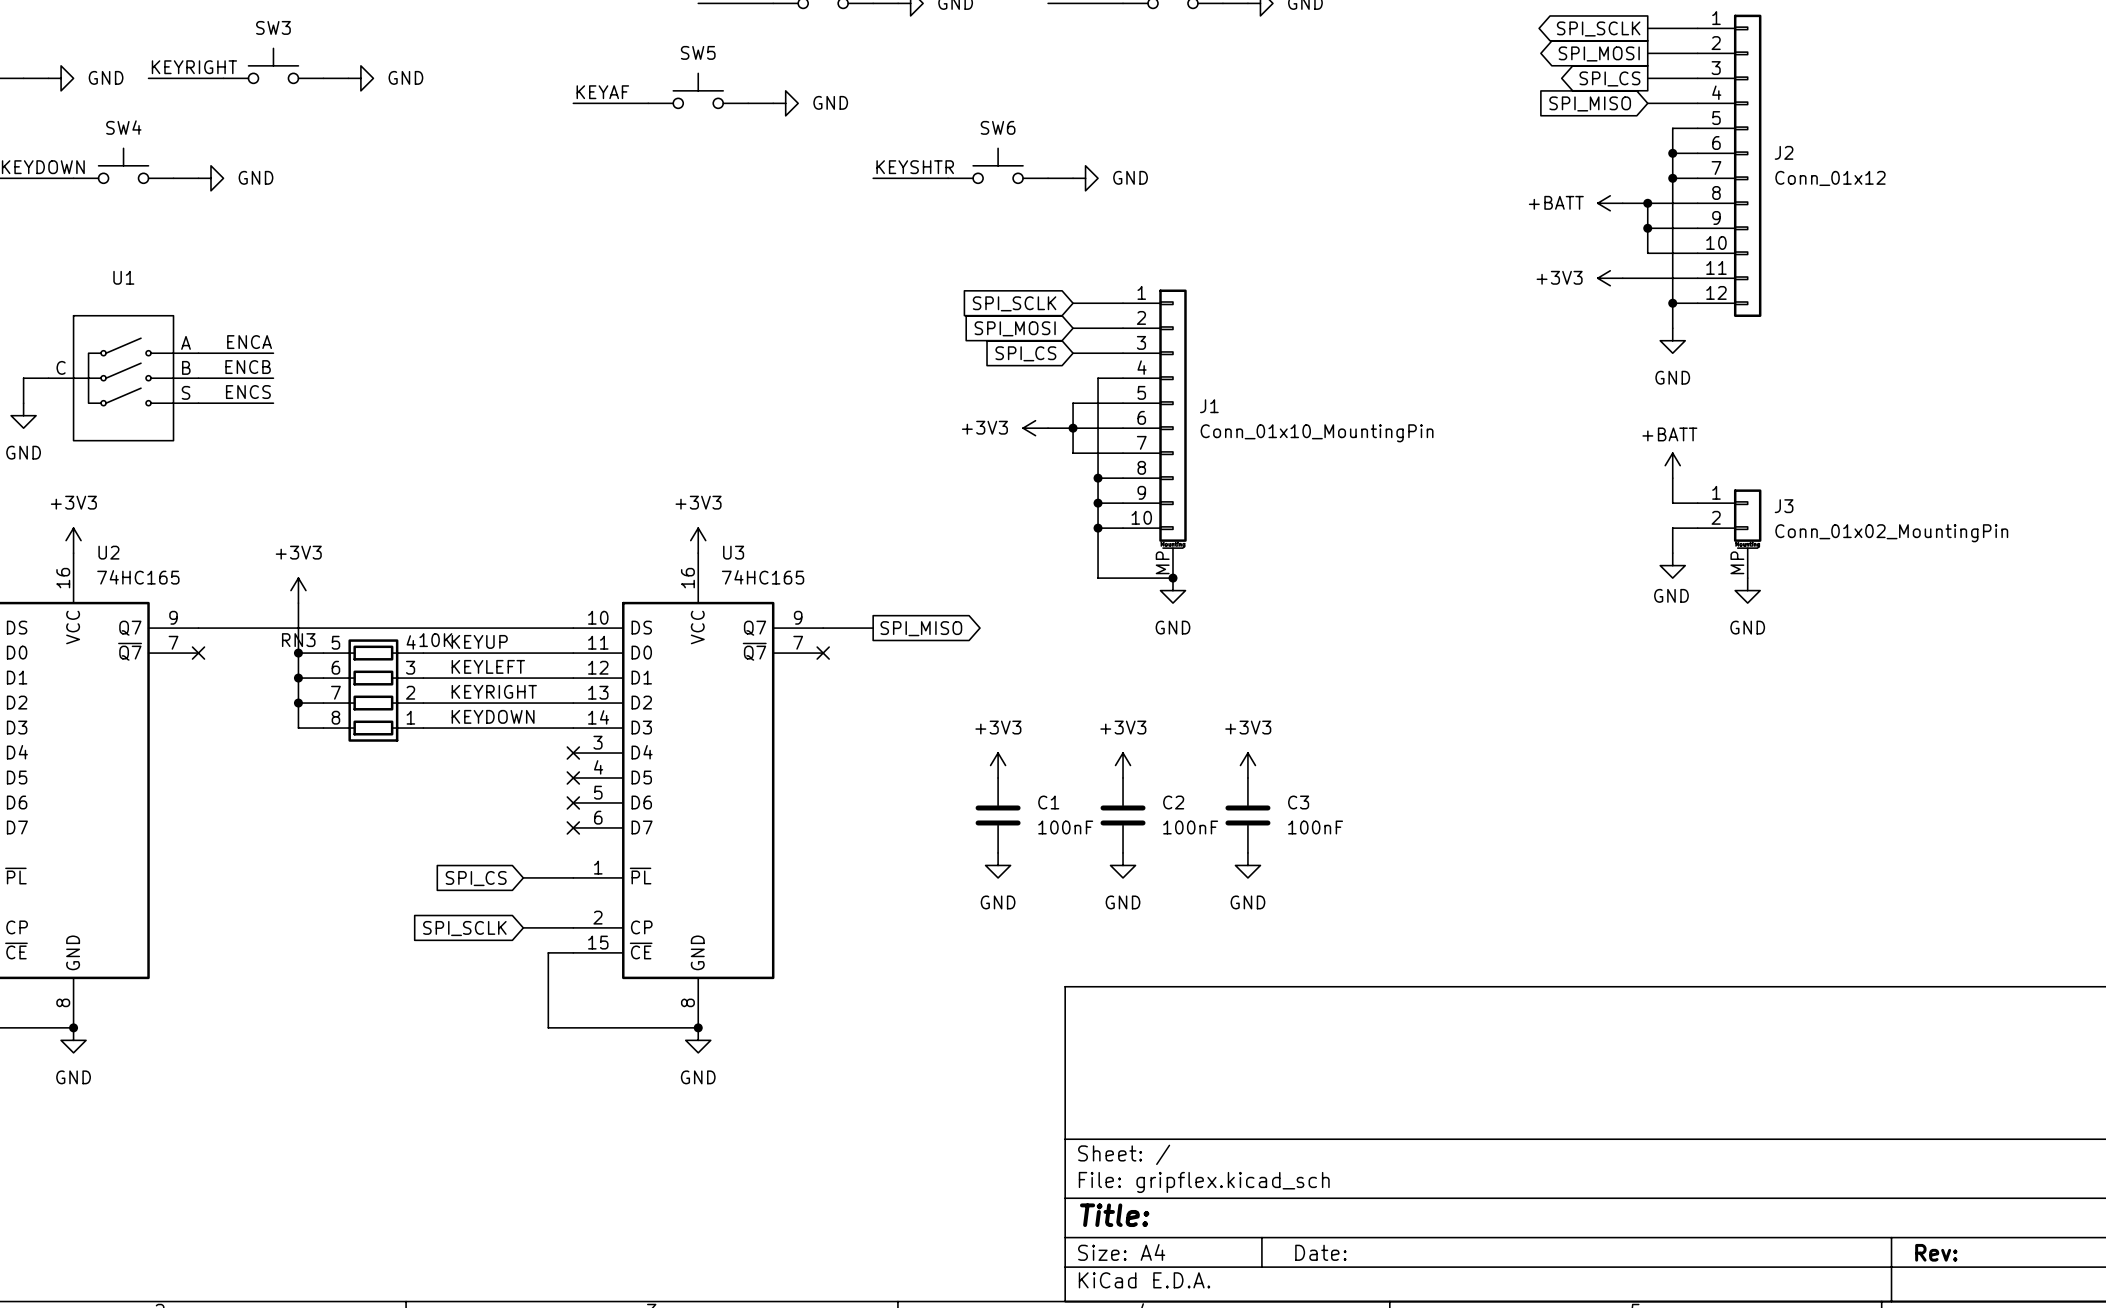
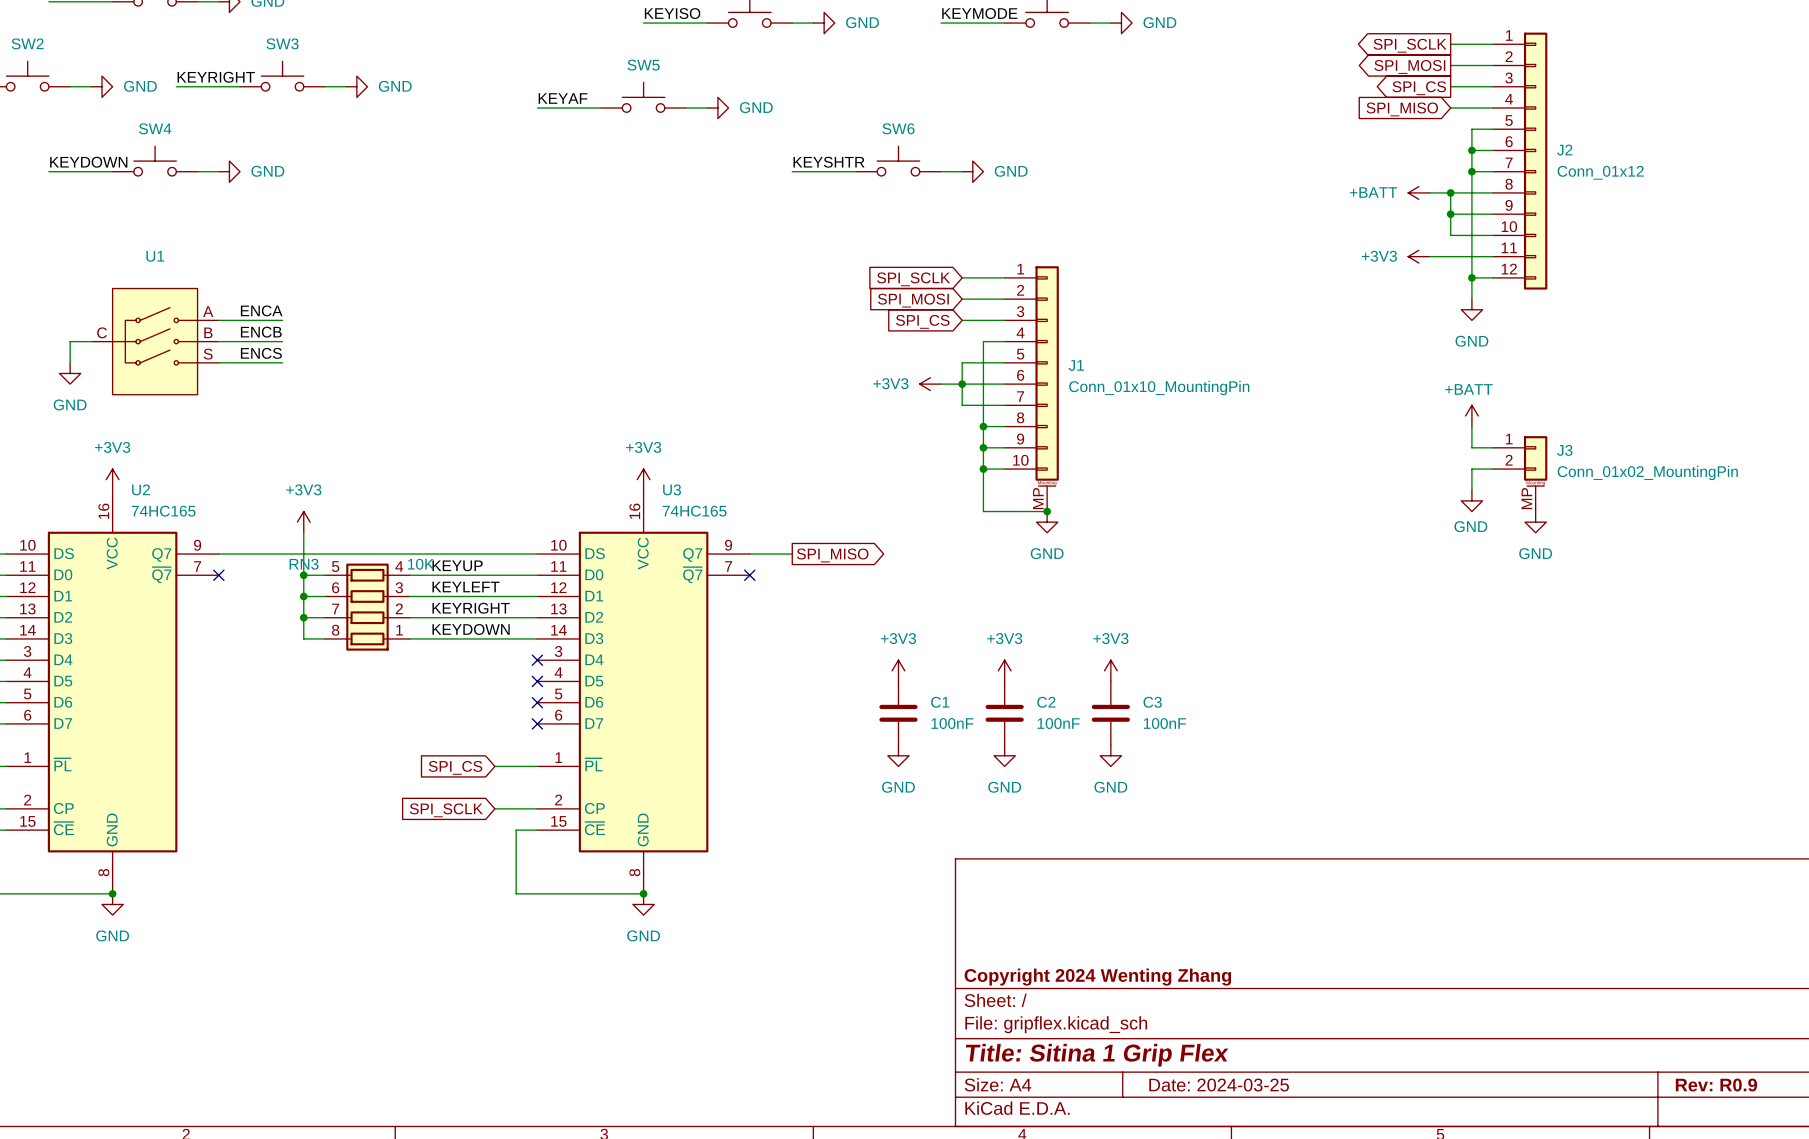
title block: none -> Copyright 2024 Wenting Zhang (1097, 977)
title block: Title: (1114, 1215) -> Title: Sitina 1 Grip Flex (1097, 1055)
title block: Date: (1320, 1252) -> Date: 2024-03-25 (1219, 1085)
title block: Rev: (1936, 1252) -> Rev: R0.9 (1716, 1085)

